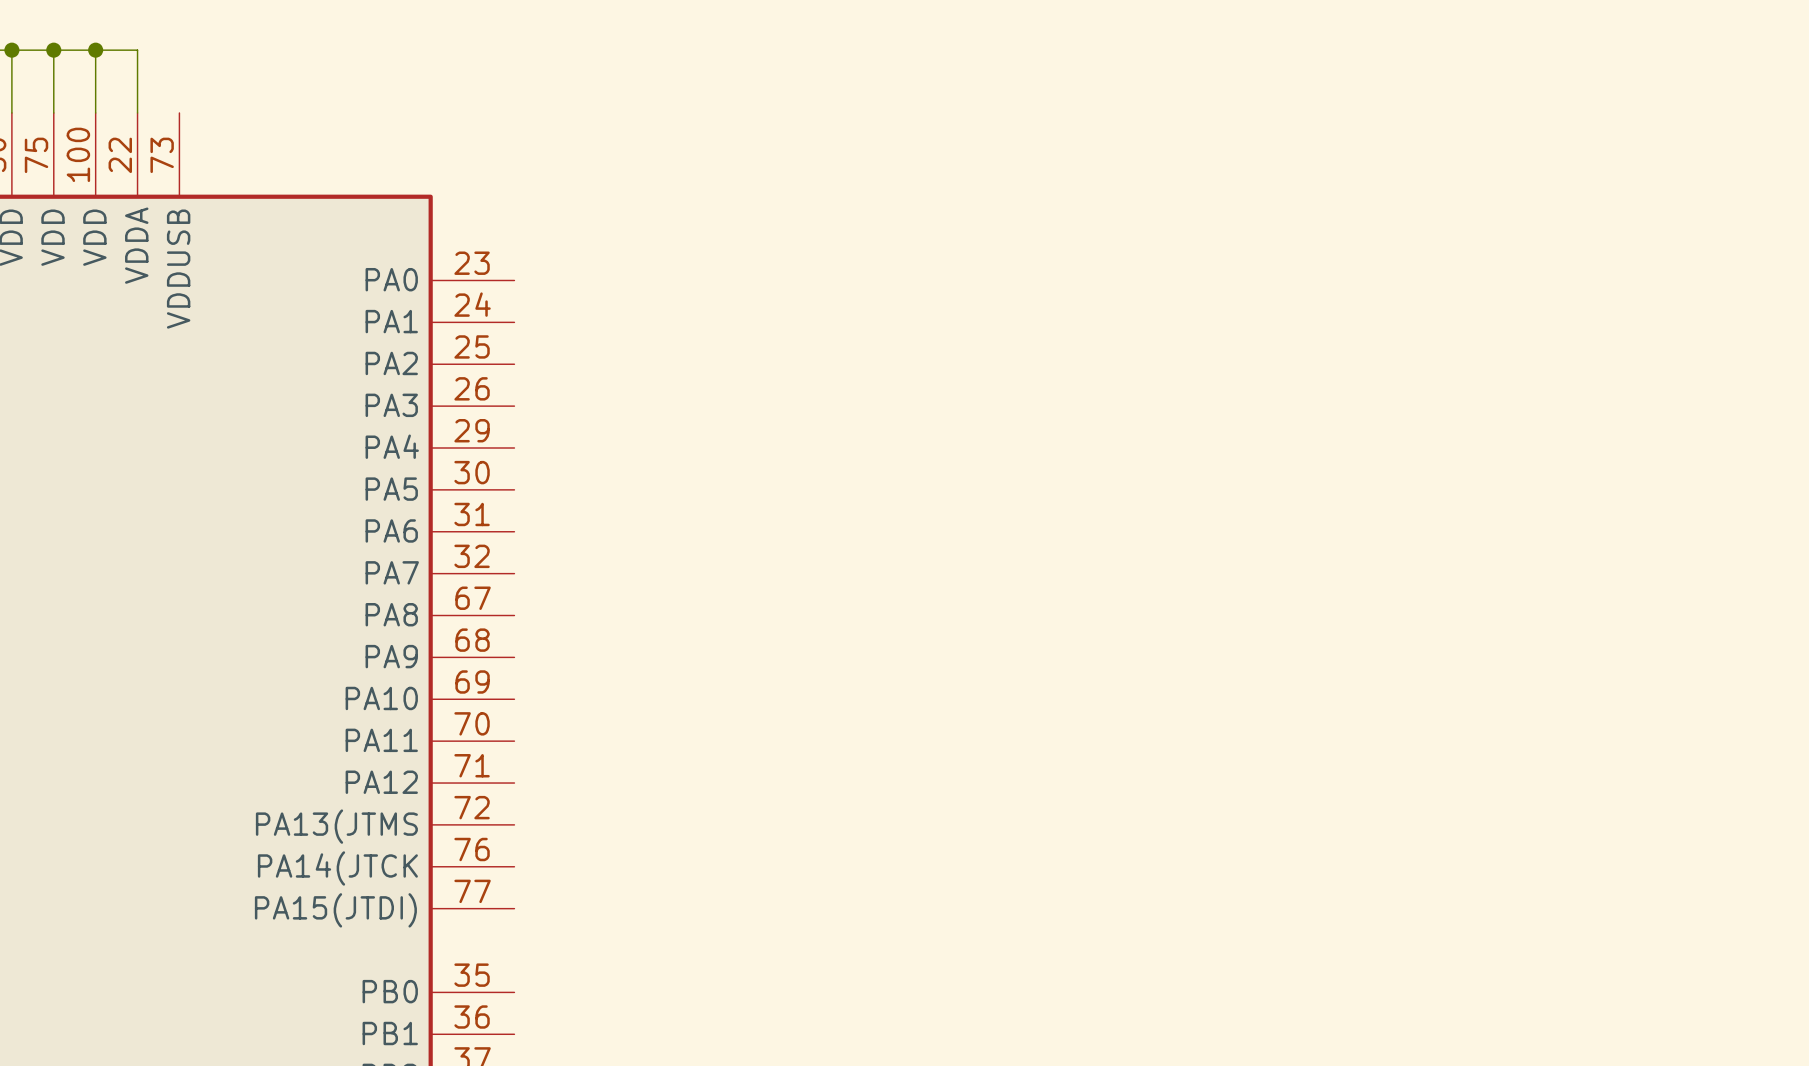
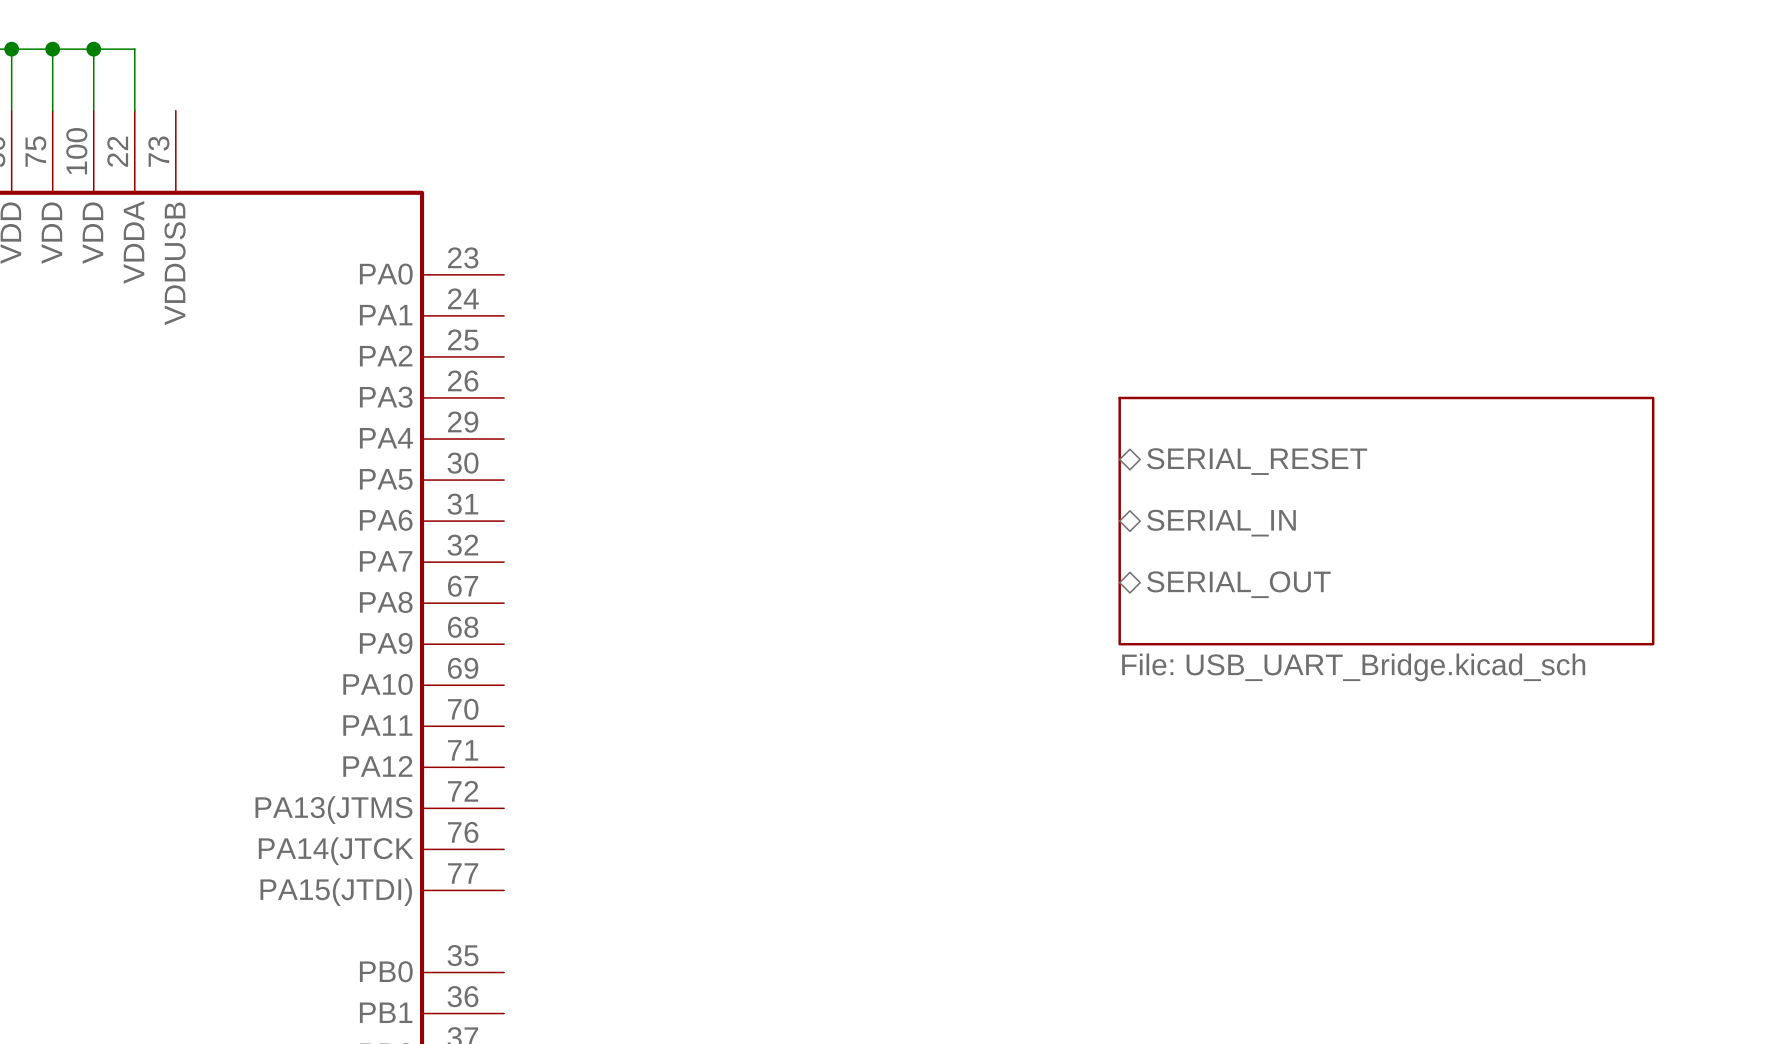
sheet pin: none -> SERIAL_RESET (1257, 461)
sheet pin: none -> SERIAL_IN (1221, 523)
sheet: none -> File: USB_UART_Bridge.kicad_sch (1386, 521)
sheet pin: none -> SERIAL_OUT (1238, 584)

